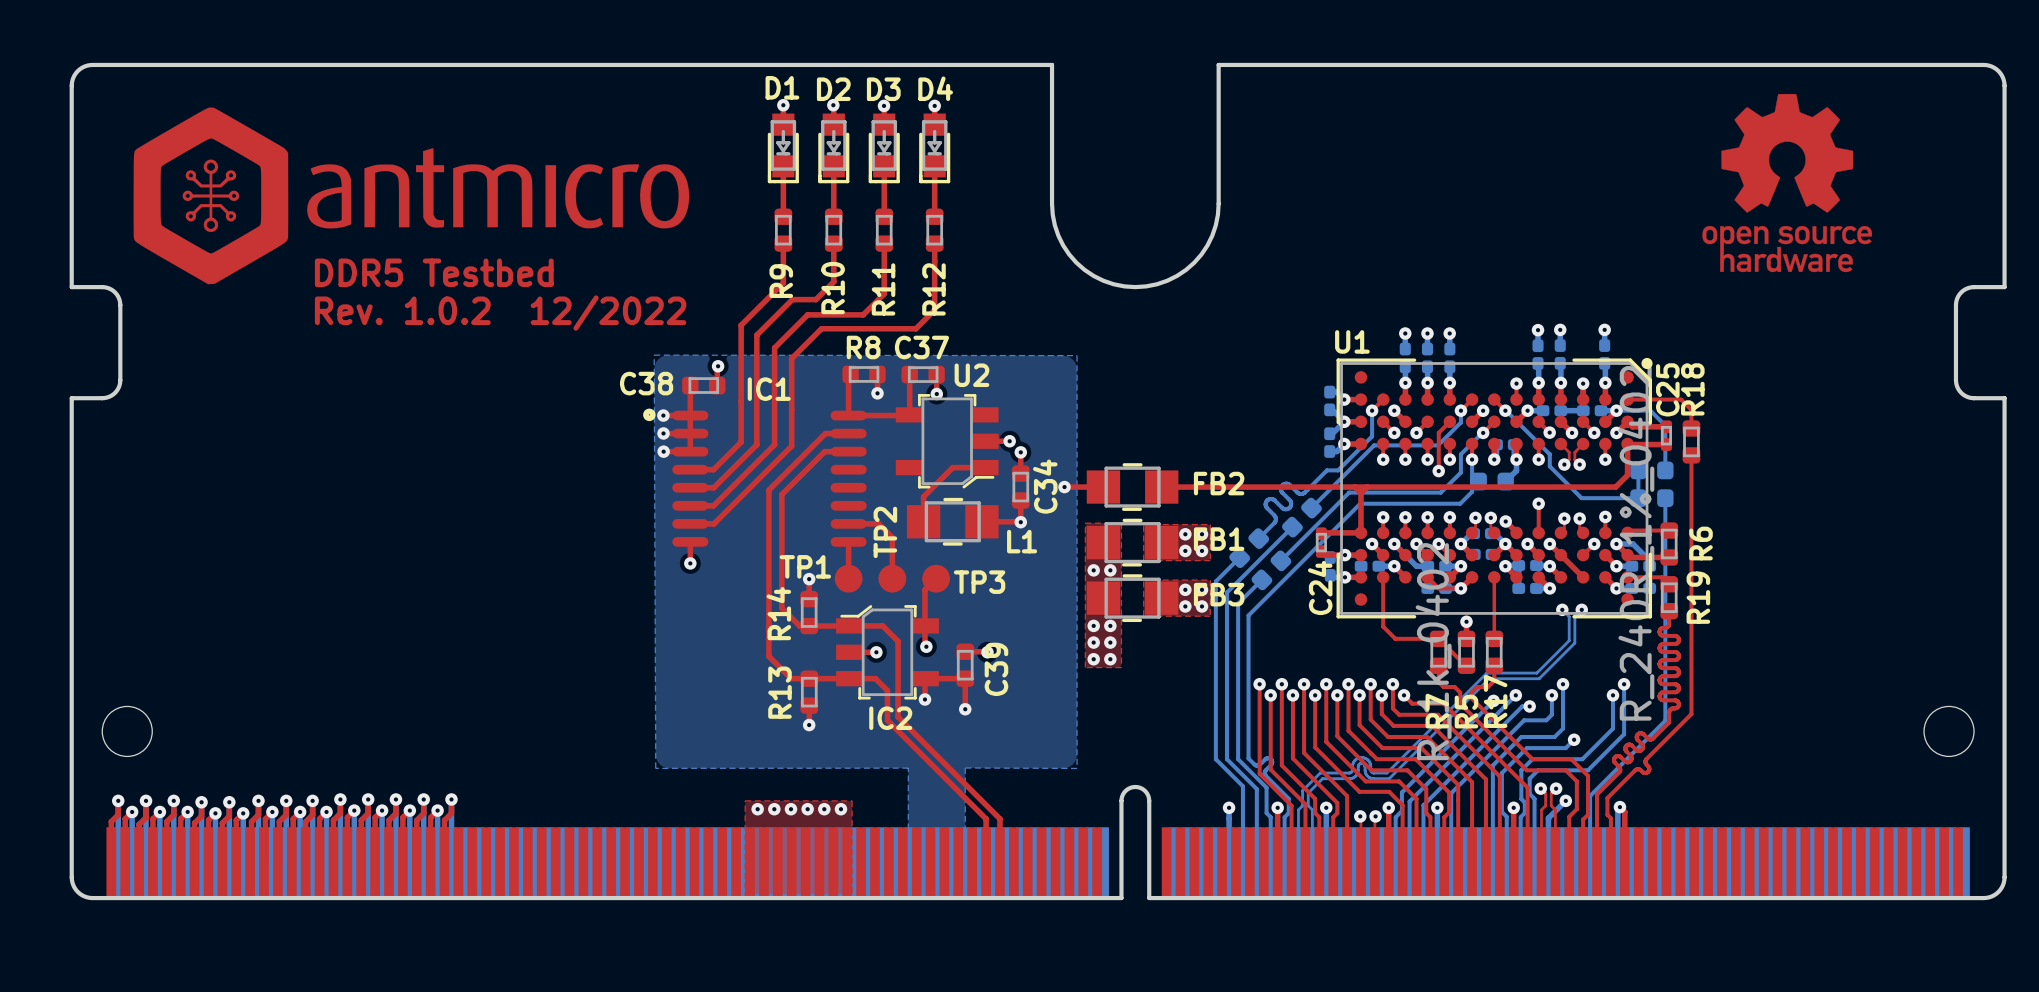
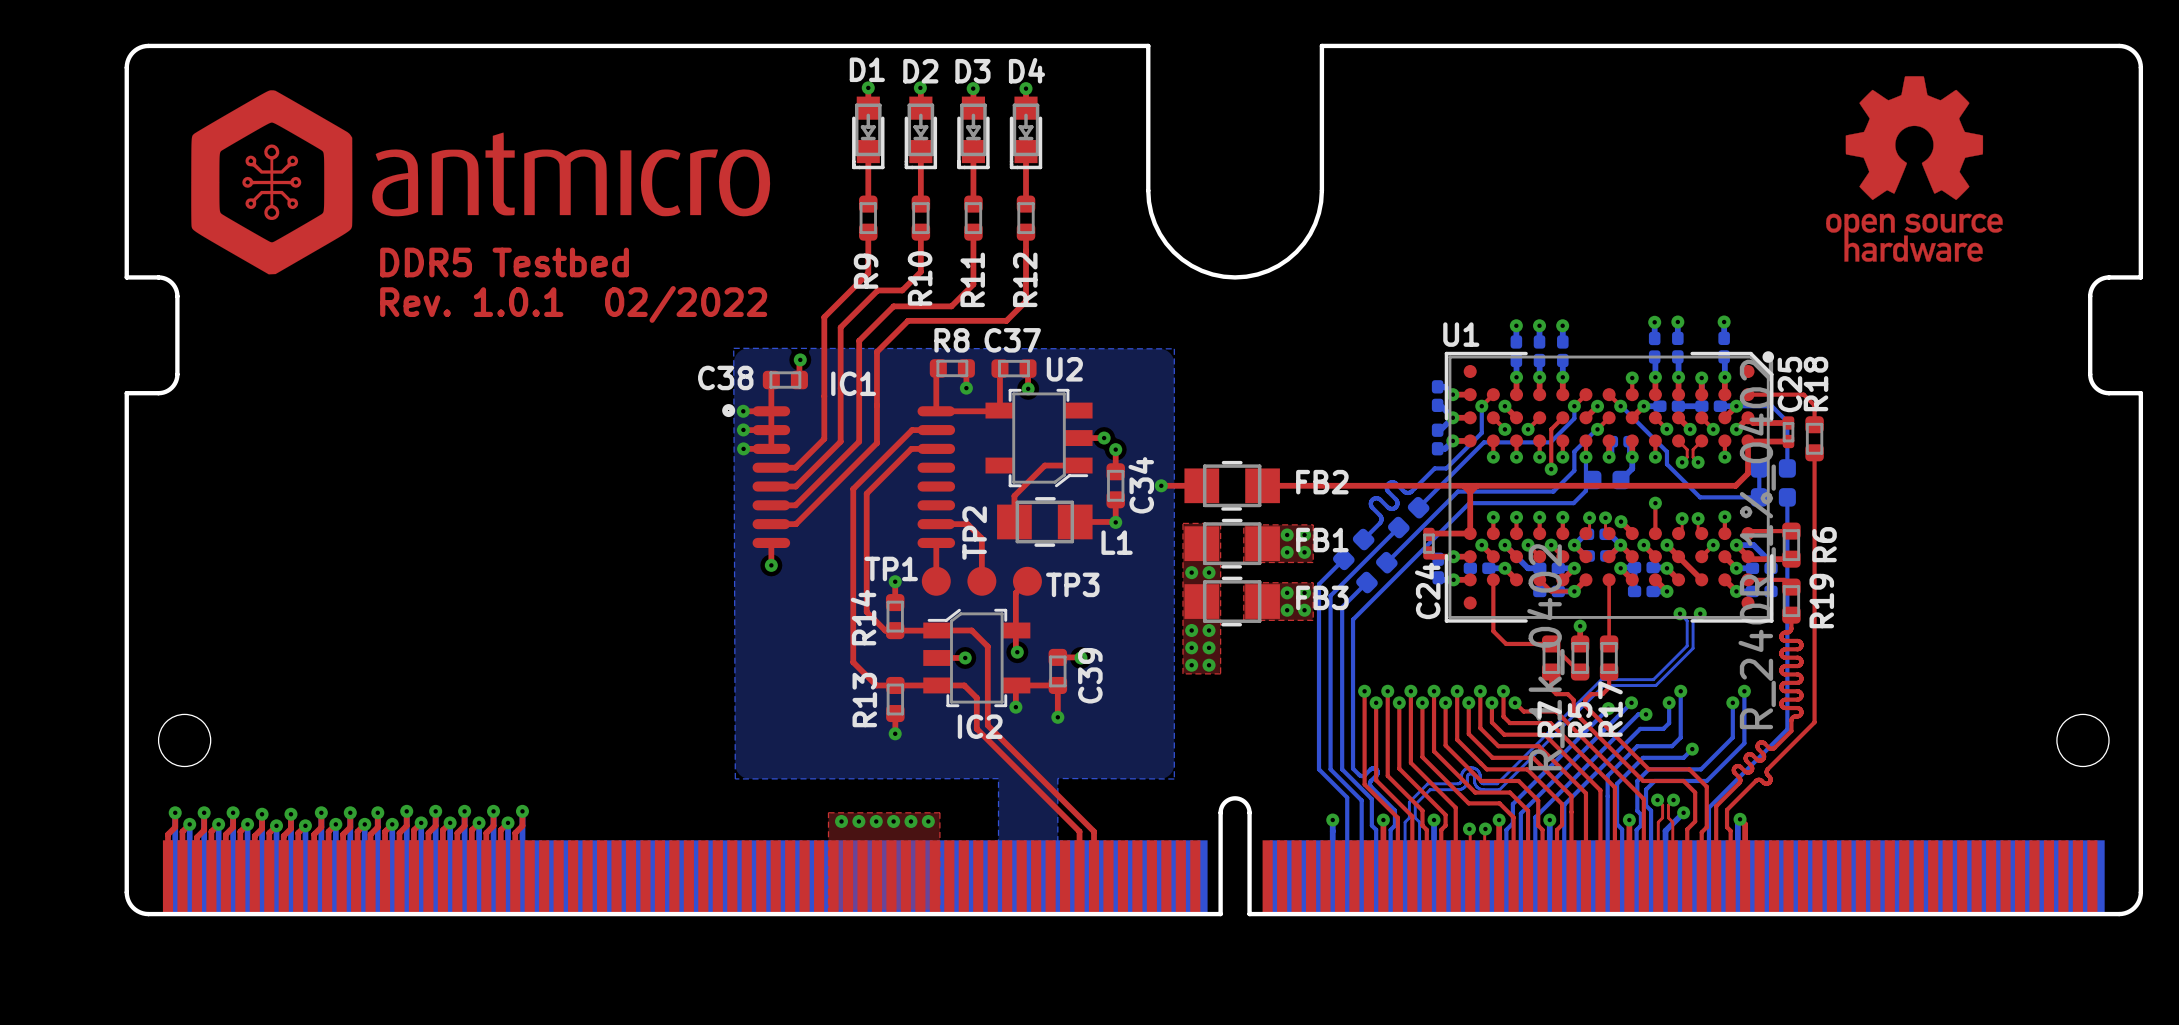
text: Rev. 1.0.2 12/2022 (500, 313) -> Rev. 1.0.1 02/2022 (573, 304)

